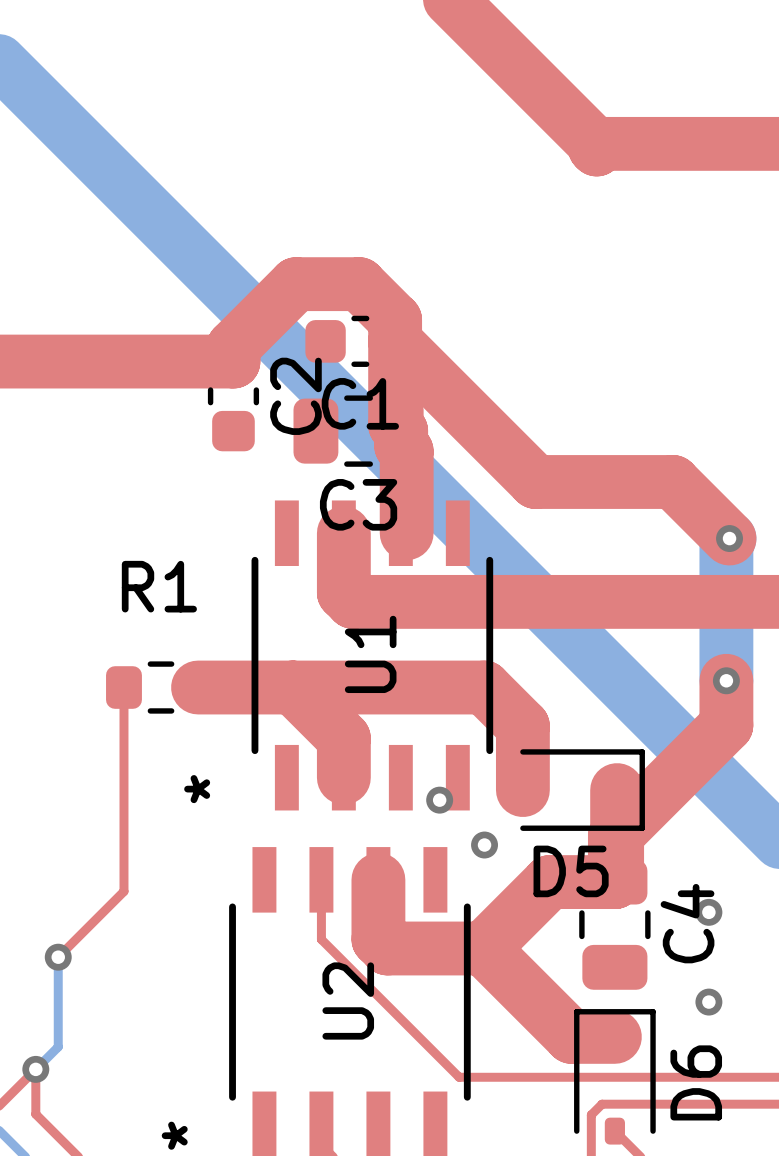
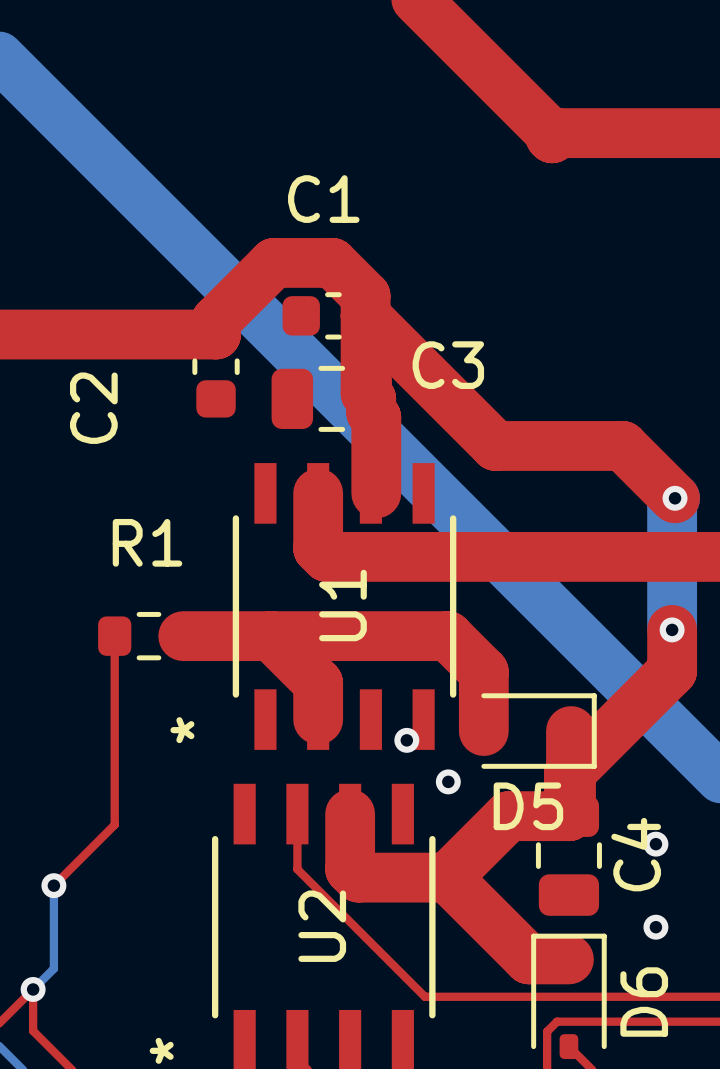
C2 name position: C2 (295, 396) -> C2 (93, 408)
C1 name position: C1 (360, 403) -> C1 (323, 199)
C3 name position: C3 (358, 504) -> C3 (448, 365)

